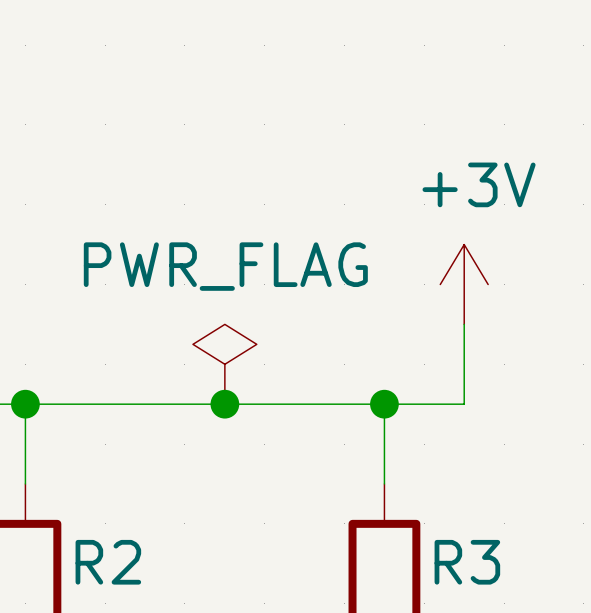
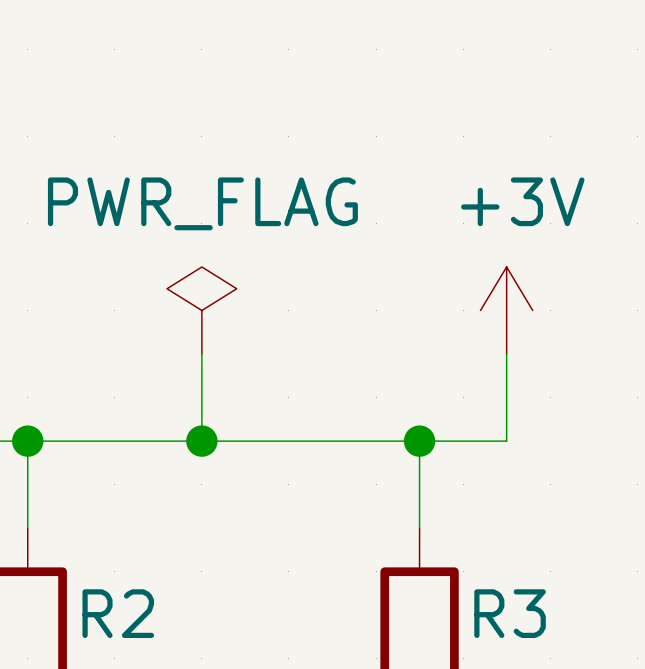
wire: none -> (201, 354) (201, 441)
power symbol position: PWR_FLAG (224, 364) -> PWR_FLAG (201, 310)
junction position: (224, 404) -> (201, 441)

